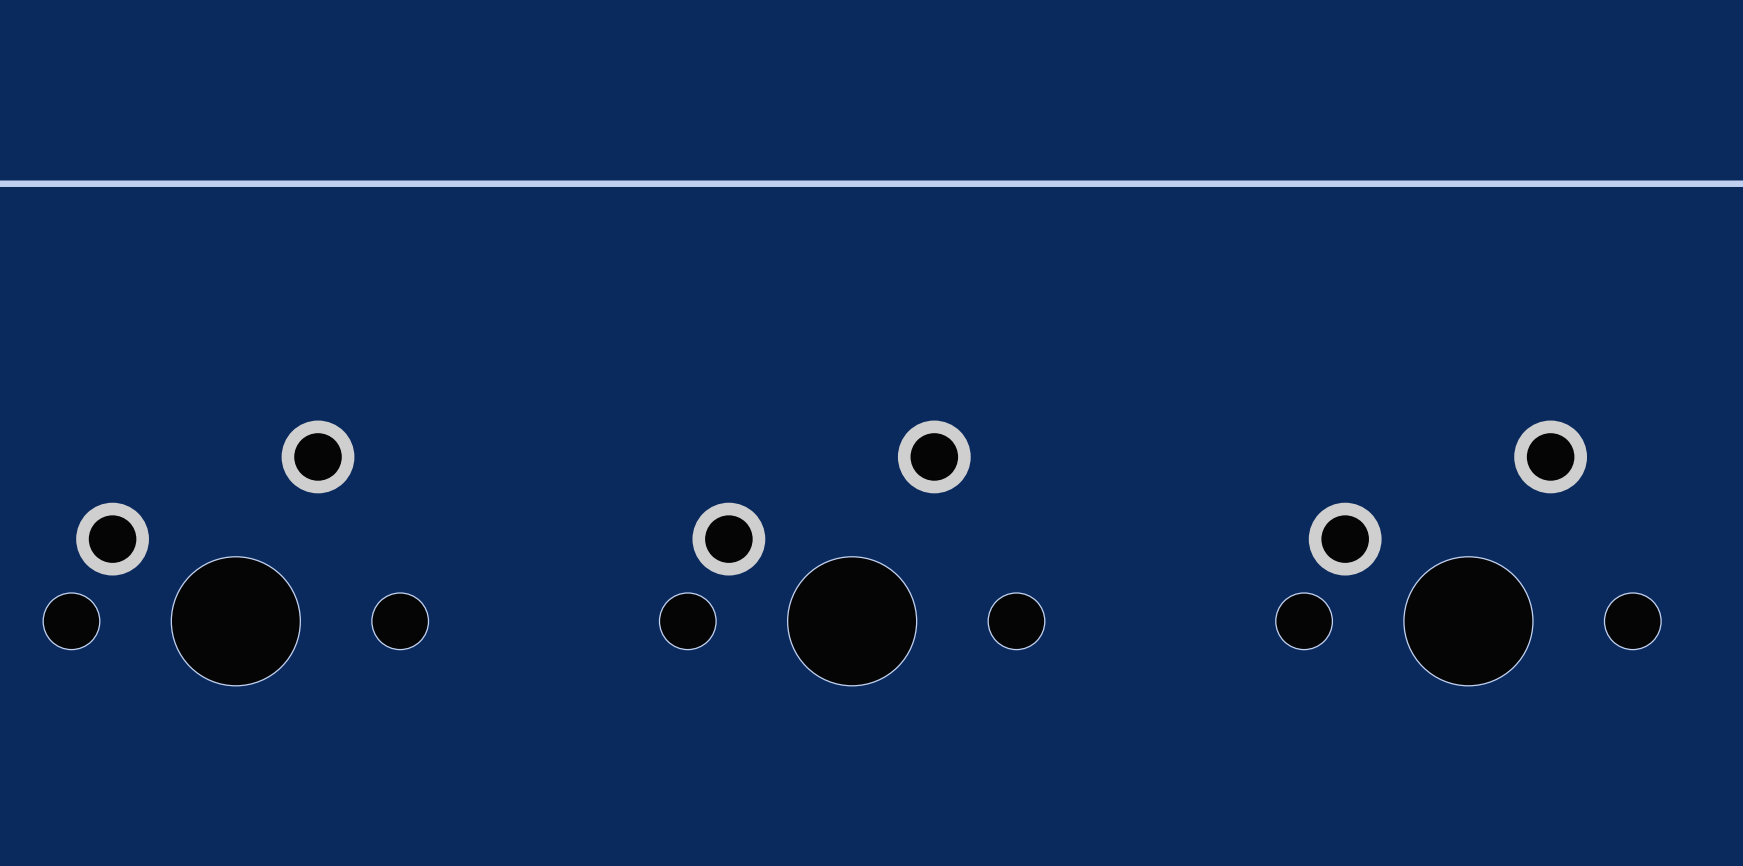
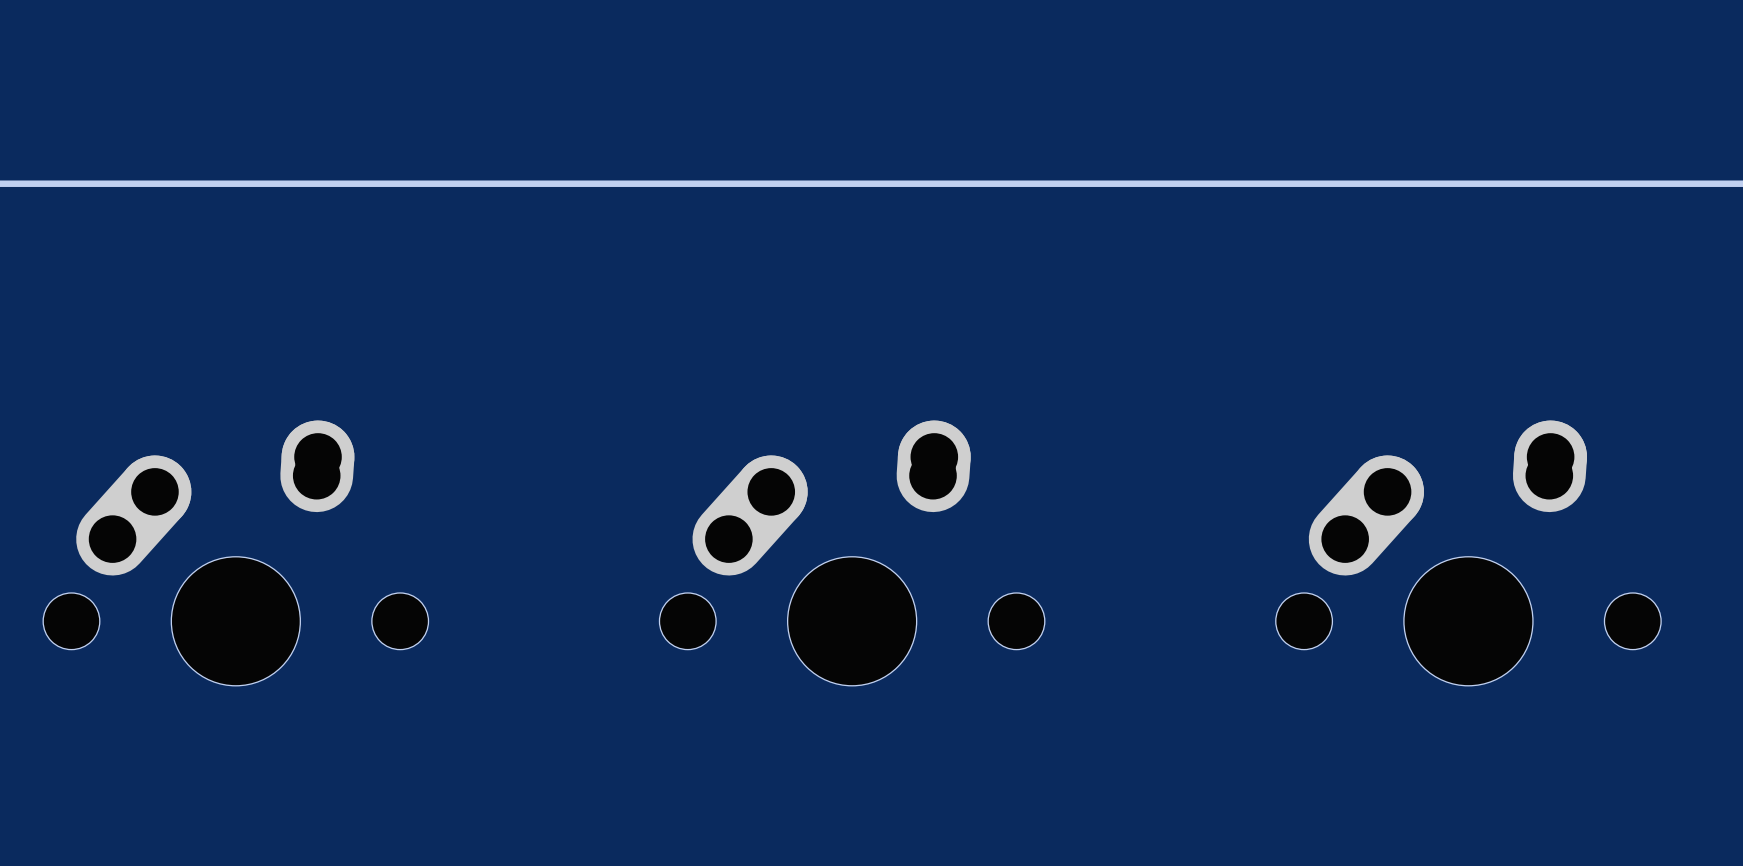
part footprint: [43, 420, 429, 686] -> [43, 420, 429, 686]
part footprint: [659, 420, 1045, 686] -> [659, 420, 1045, 686]
part footprint: [1275, 420, 1662, 686] -> [1275, 420, 1662, 686]

